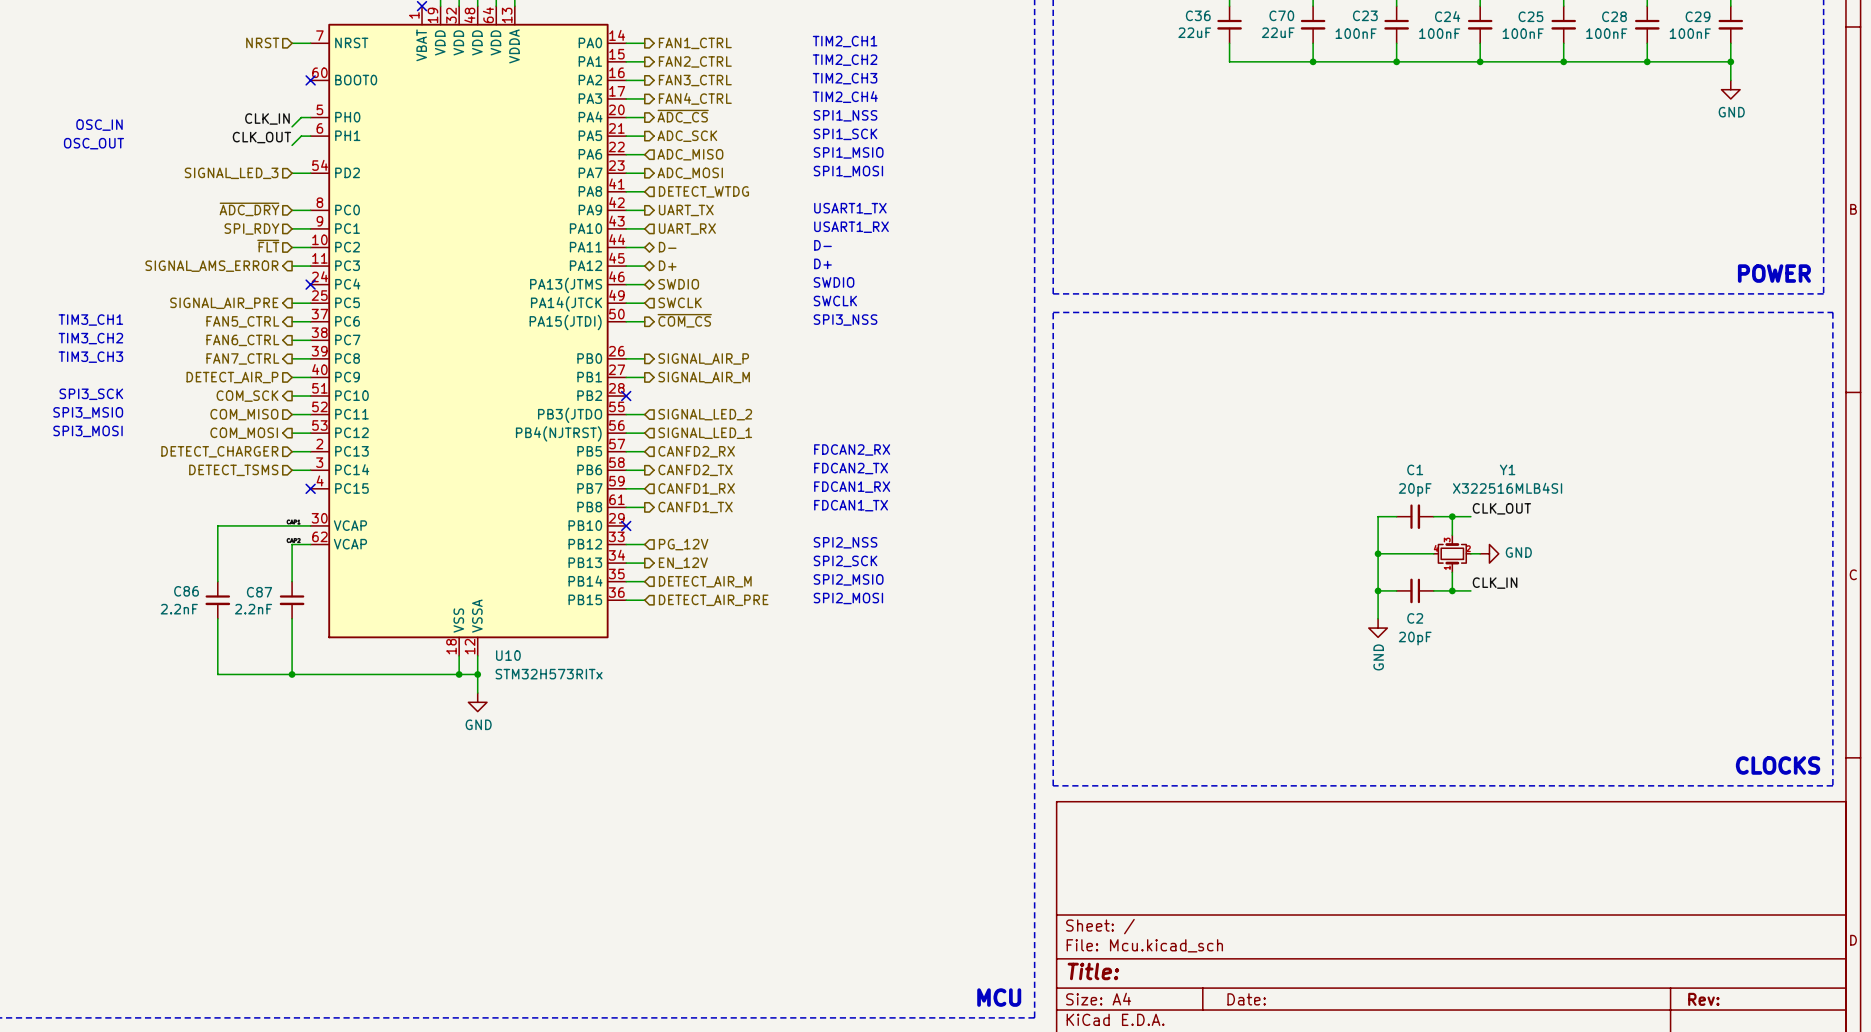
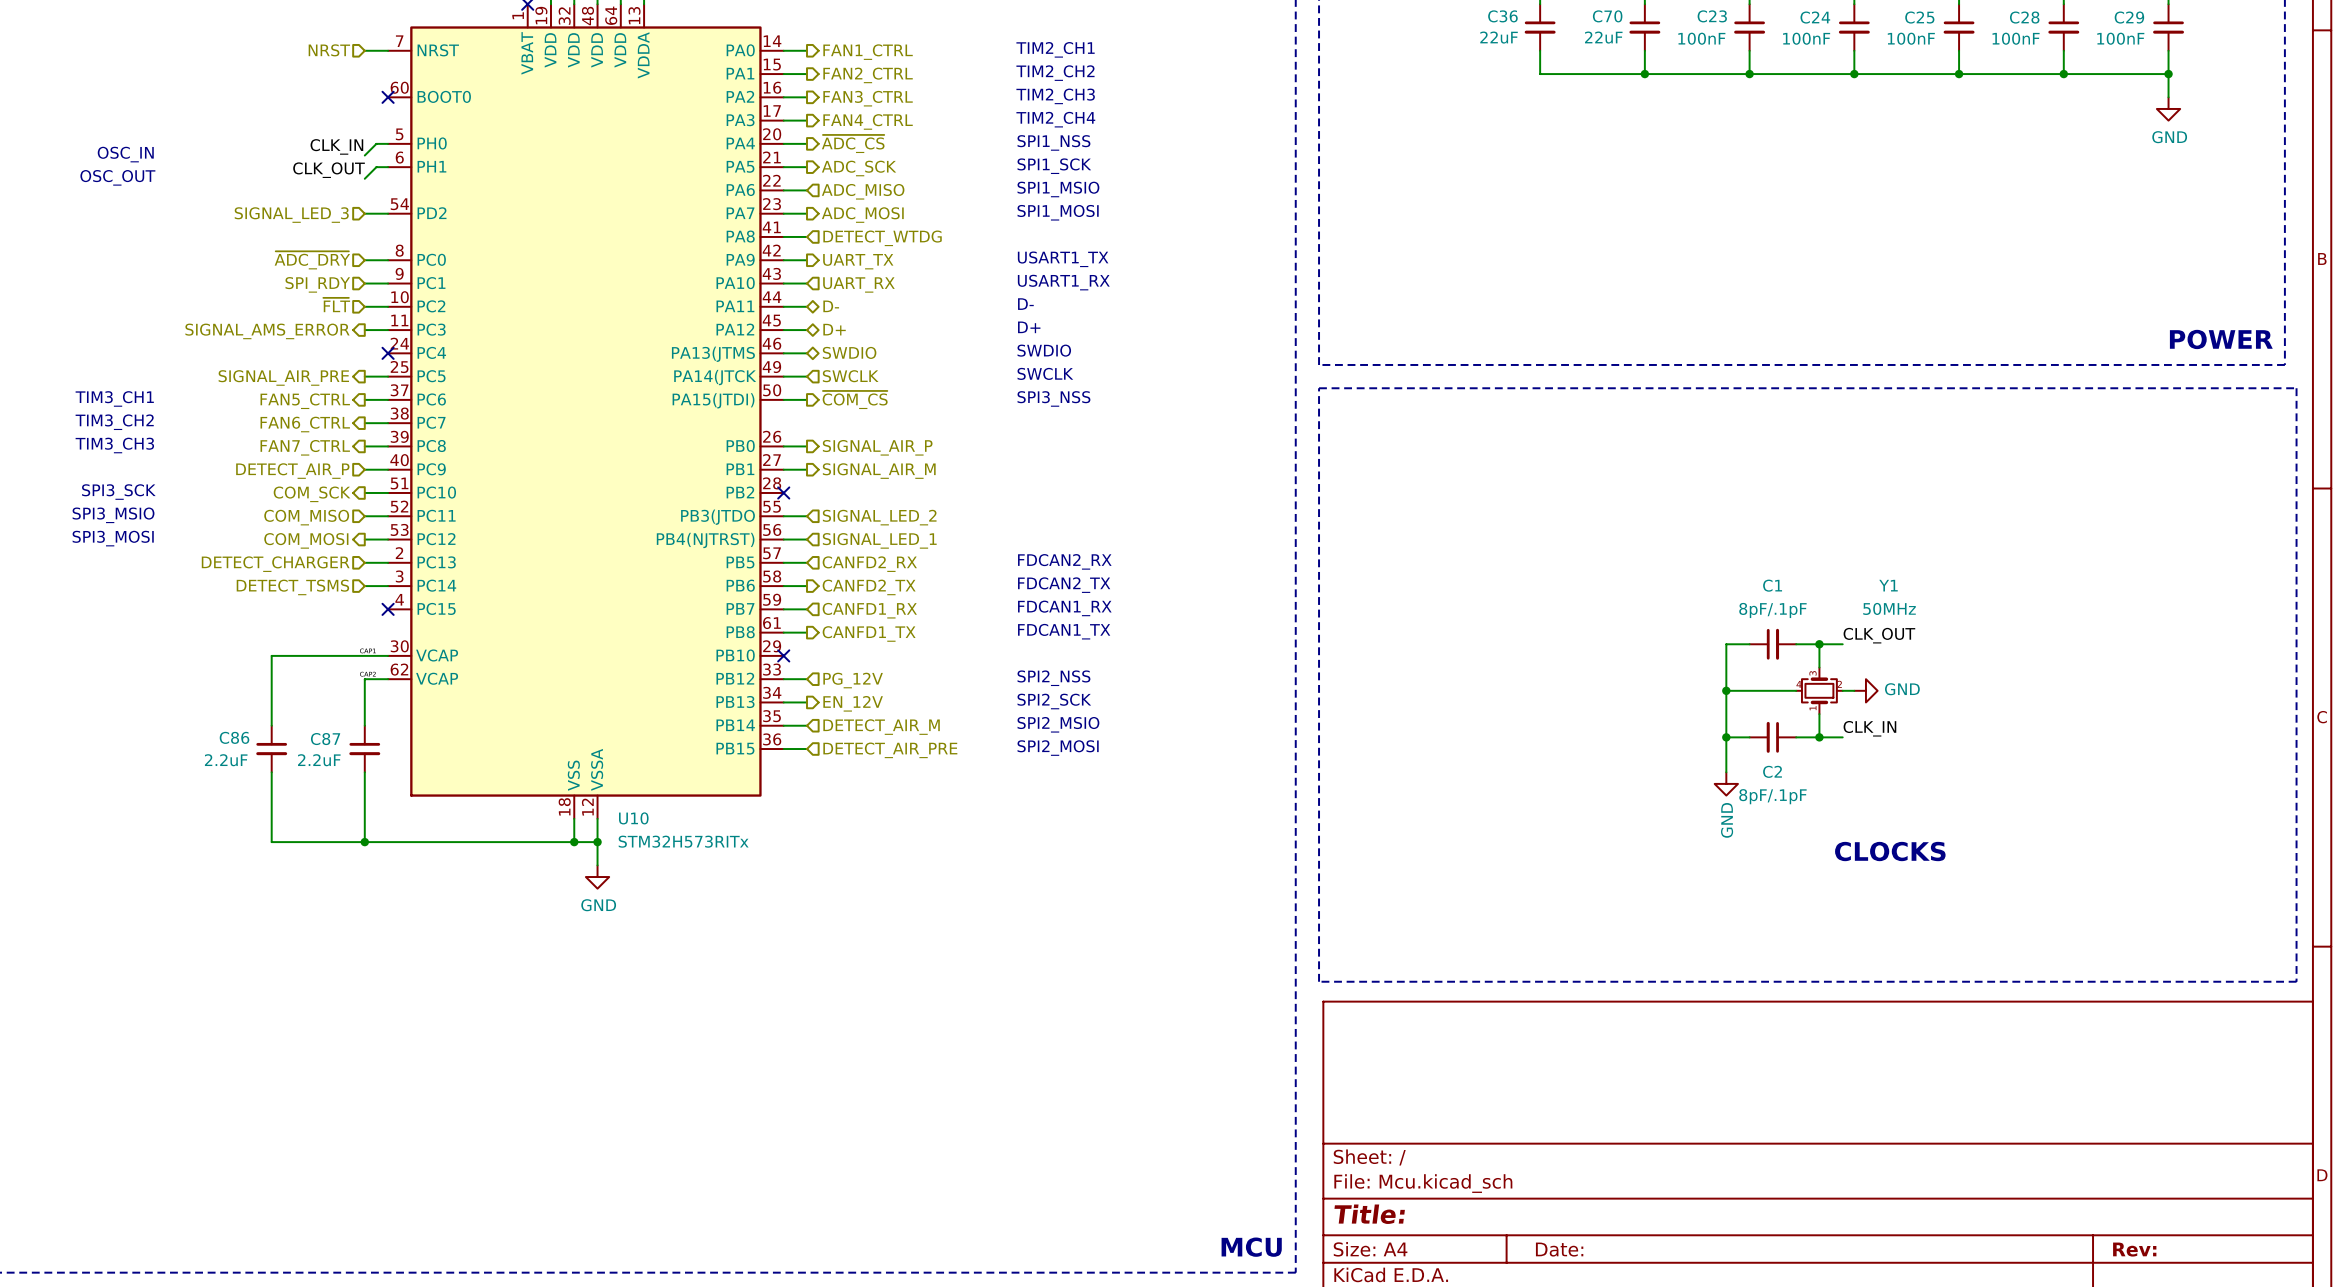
Y1 value: X322516MLB4SI (1507, 488) -> 50MHz (1889, 608)
C1 value: 20pF (1415, 490) -> 8pF/.1pF (1772, 610)
C86 value: 2.2nF (179, 609) -> 2.2uF (226, 760)
C87 value: 2.2nF (253, 609) -> 2.2uF (319, 760)
C2 value: 20pF (1415, 638) -> 8pF/.1pF (1772, 796)
text: none -> CLOCKS (1890, 851)
text: CLOCKS (1778, 765) -> none

